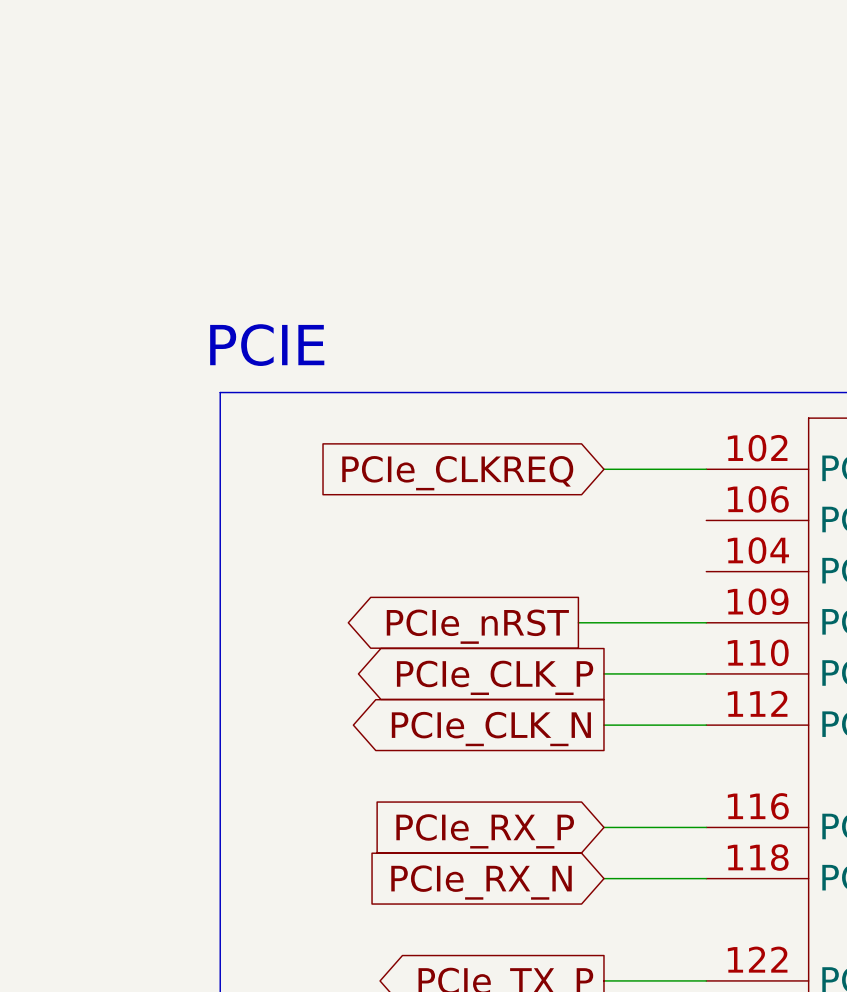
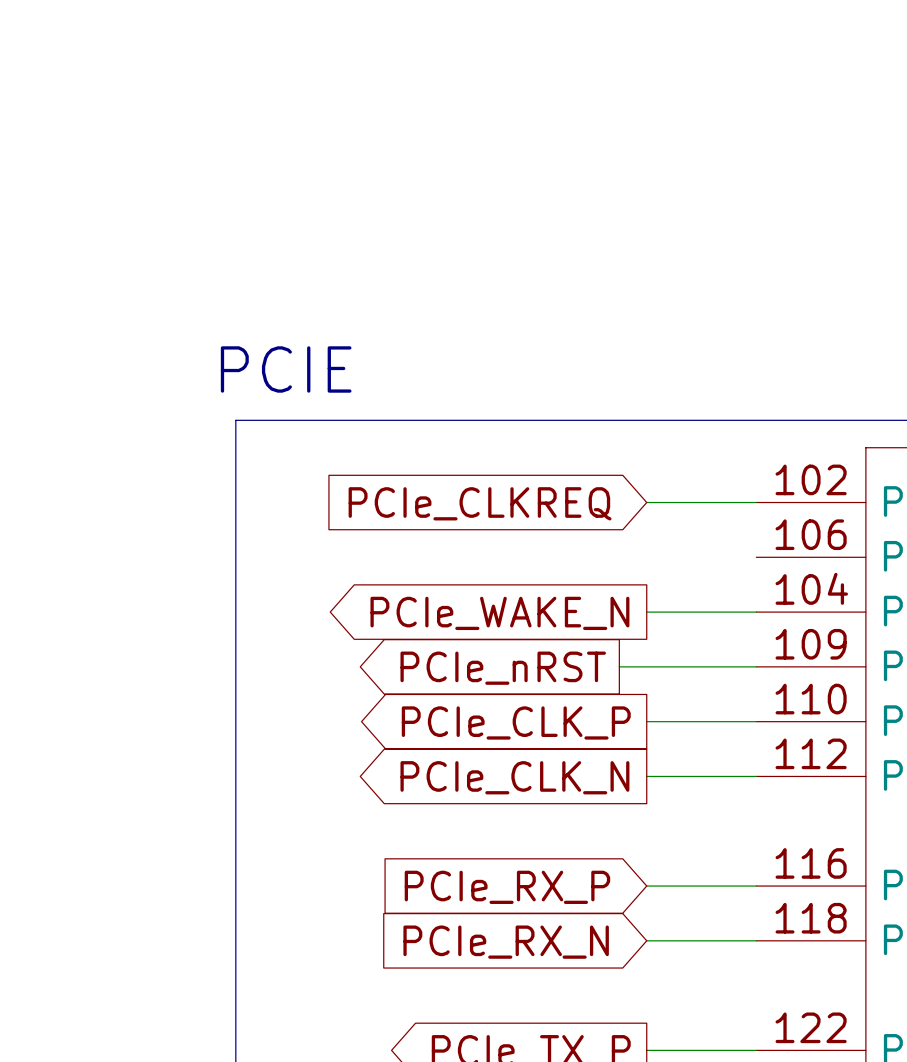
wire: none -> (646, 612) (756, 612)
global label: none -> PCIe_WAKE_N (499, 613)

